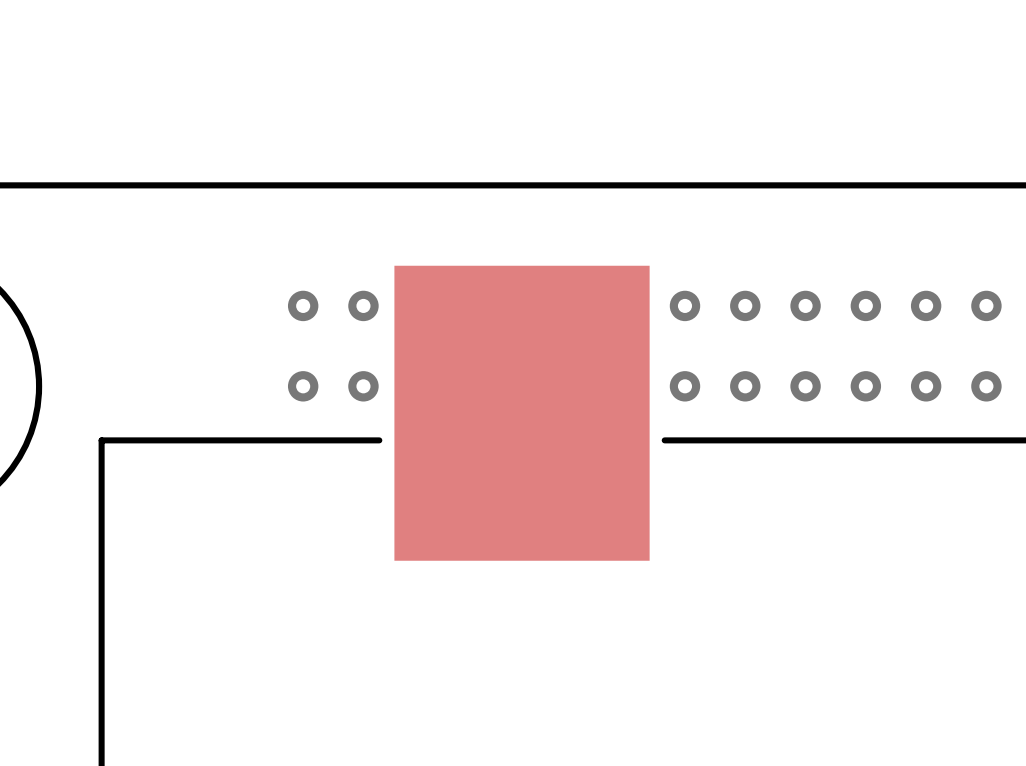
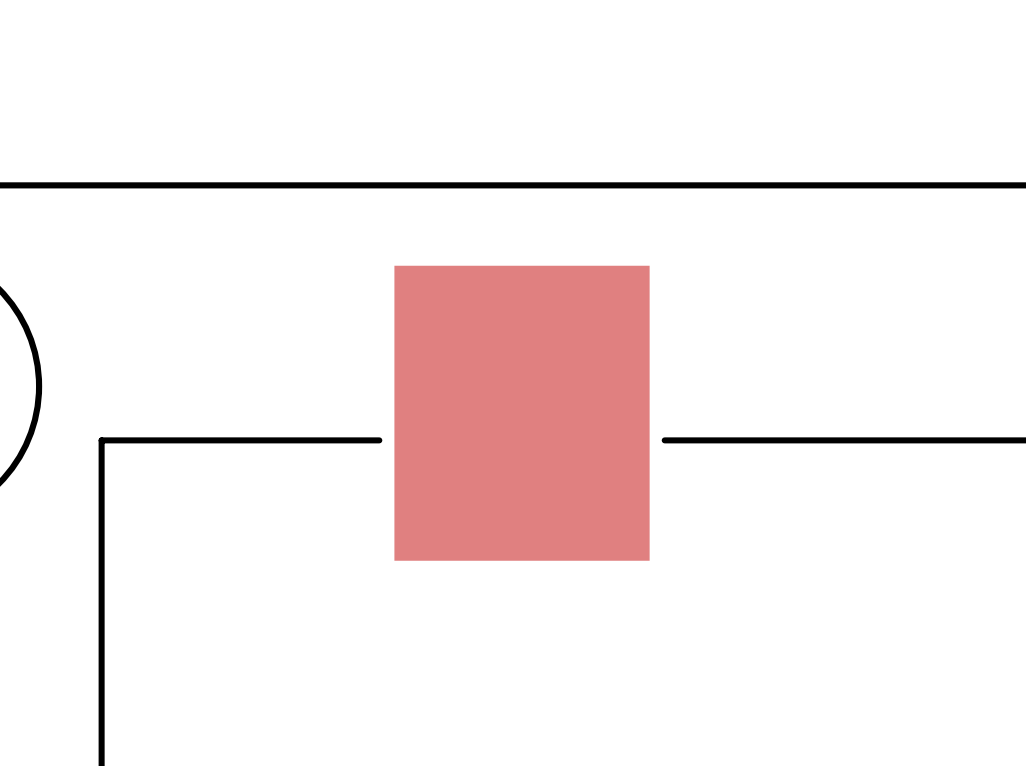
via: (303, 305) -> none
via: (363, 305) -> none
via: (684, 305) -> none
via: (745, 305) -> none
via: (805, 305) -> none
via: (865, 305) -> none
via: (926, 305) -> none
via: (986, 305) -> none
via: (303, 386) -> none
via: (363, 386) -> none
via: (684, 386) -> none
via: (745, 386) -> none
via: (805, 386) -> none
via: (865, 386) -> none
via: (926, 386) -> none
via: (986, 386) -> none

